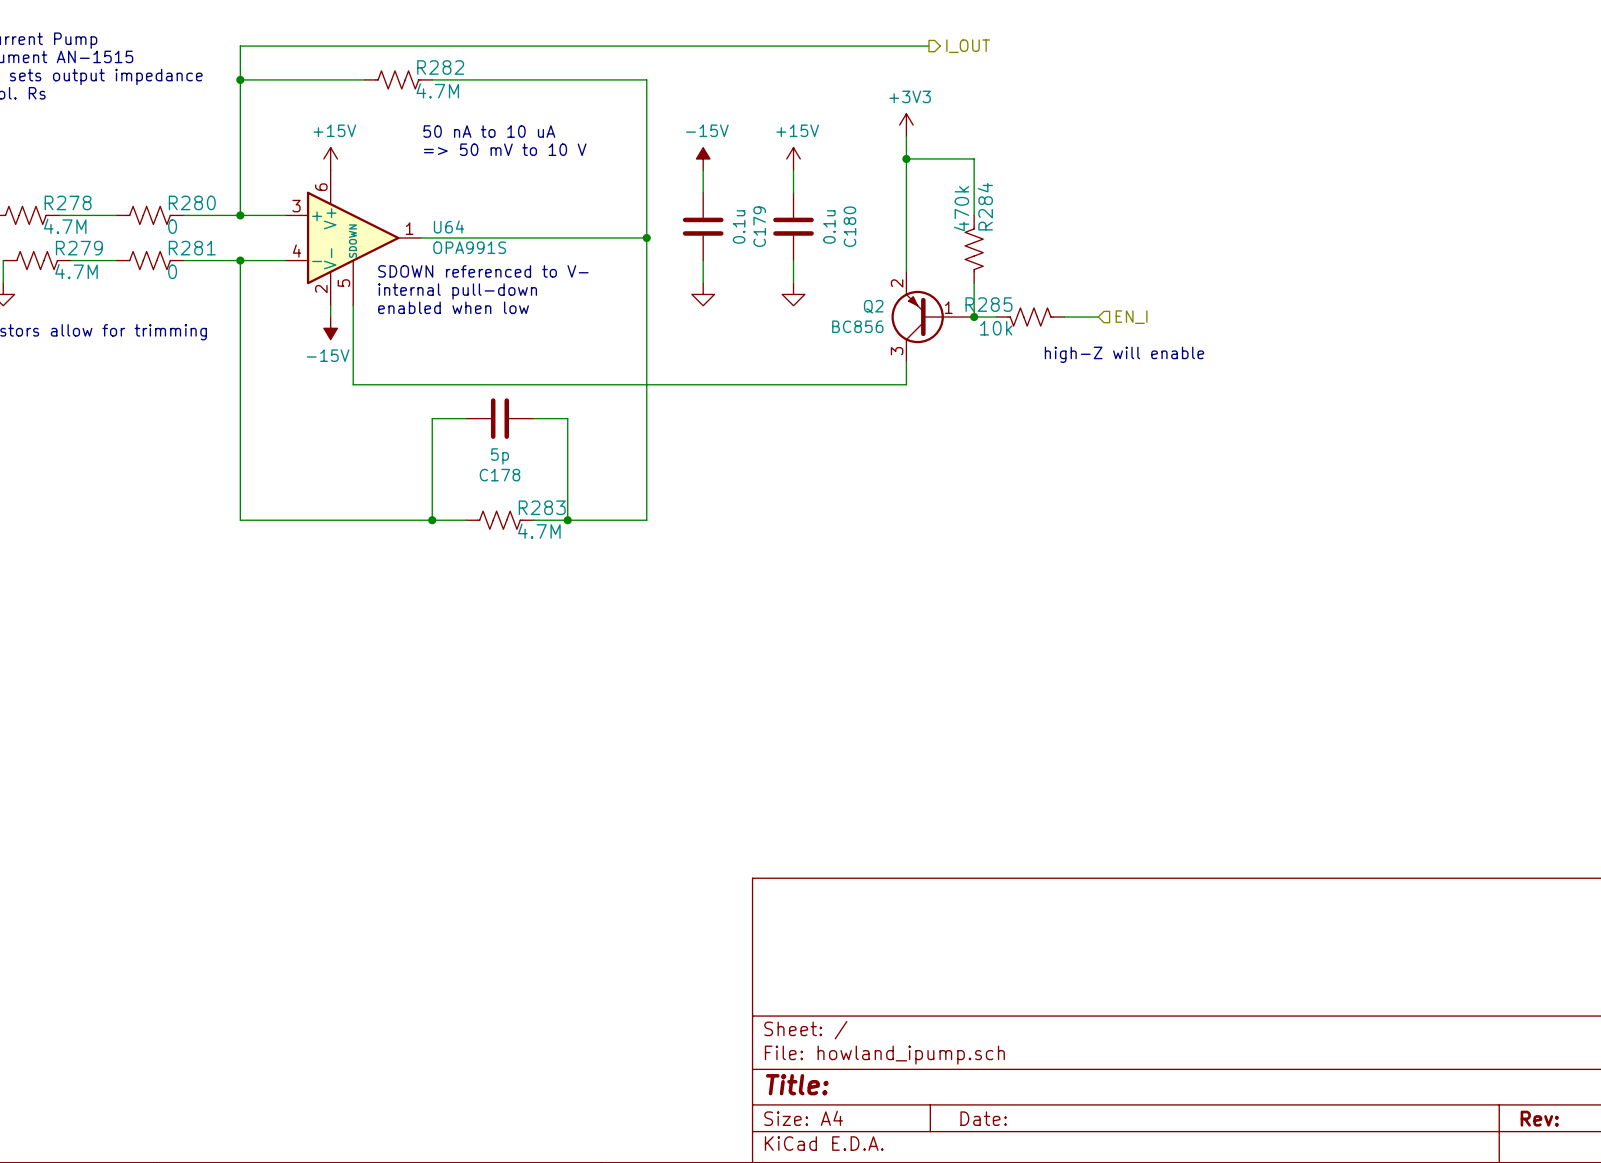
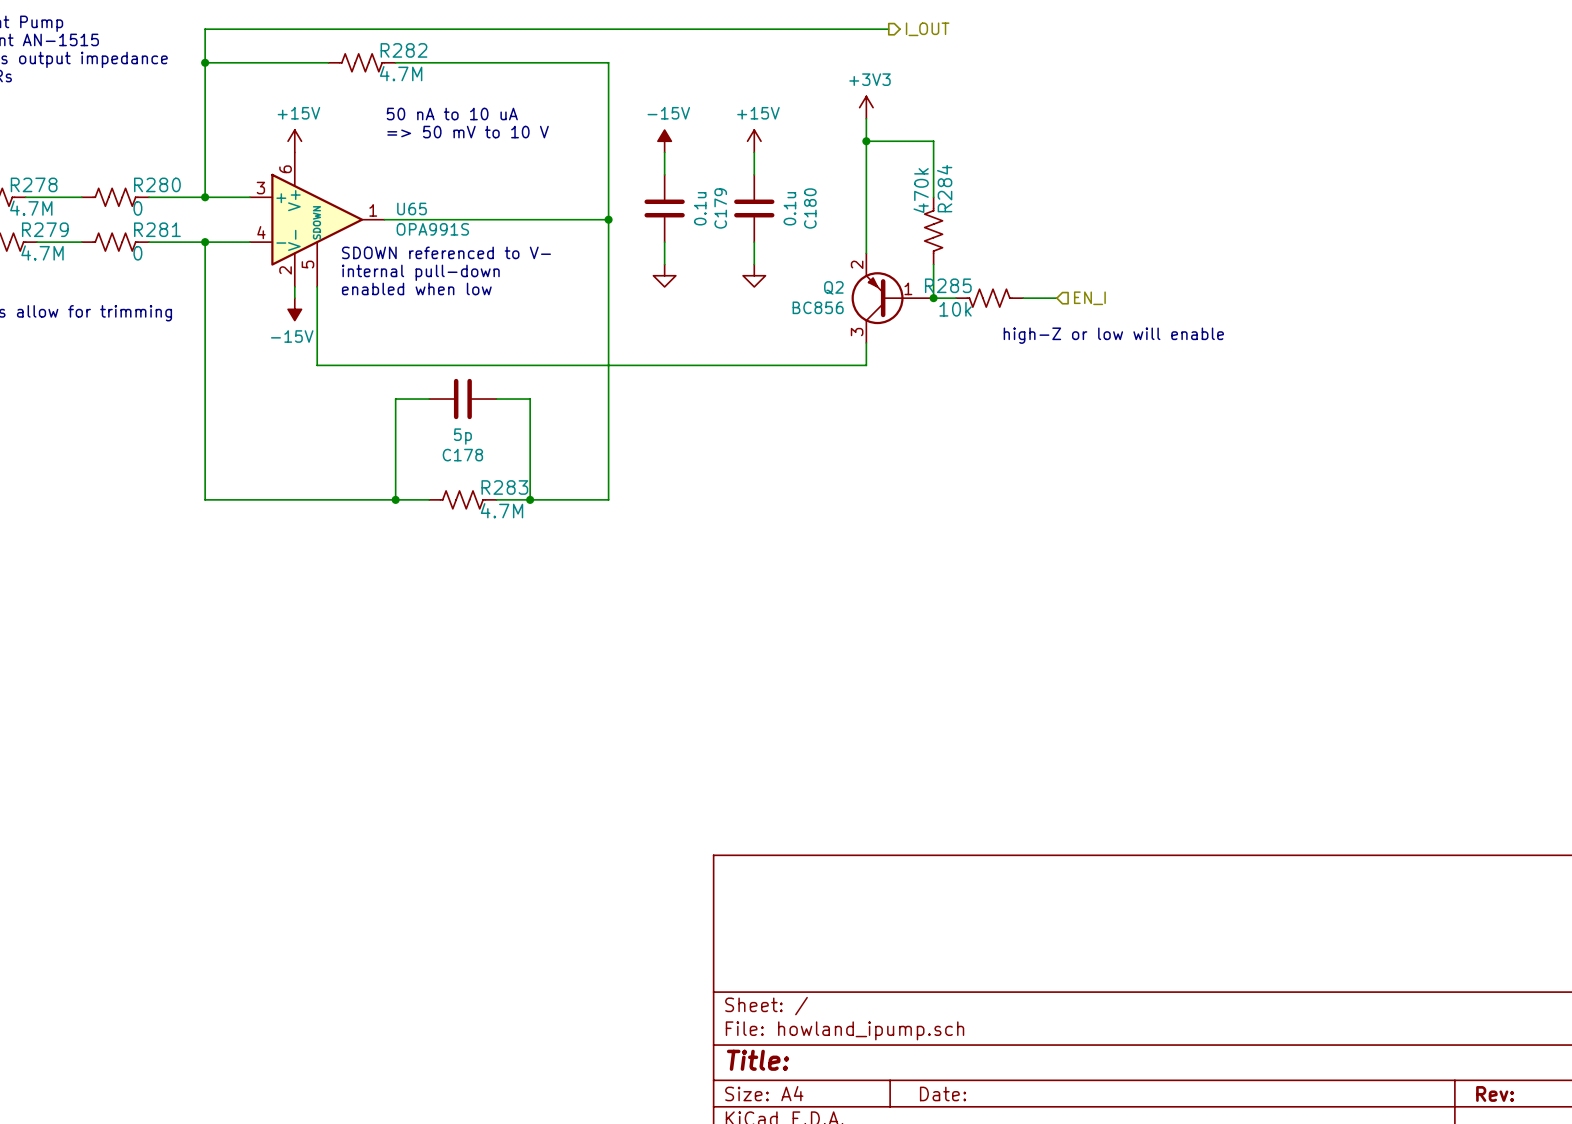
U64 name: U64 (448, 226) -> U65 (412, 208)
text: high-Z will enable (1124, 354) -> high-Z or low will enable (1113, 335)

